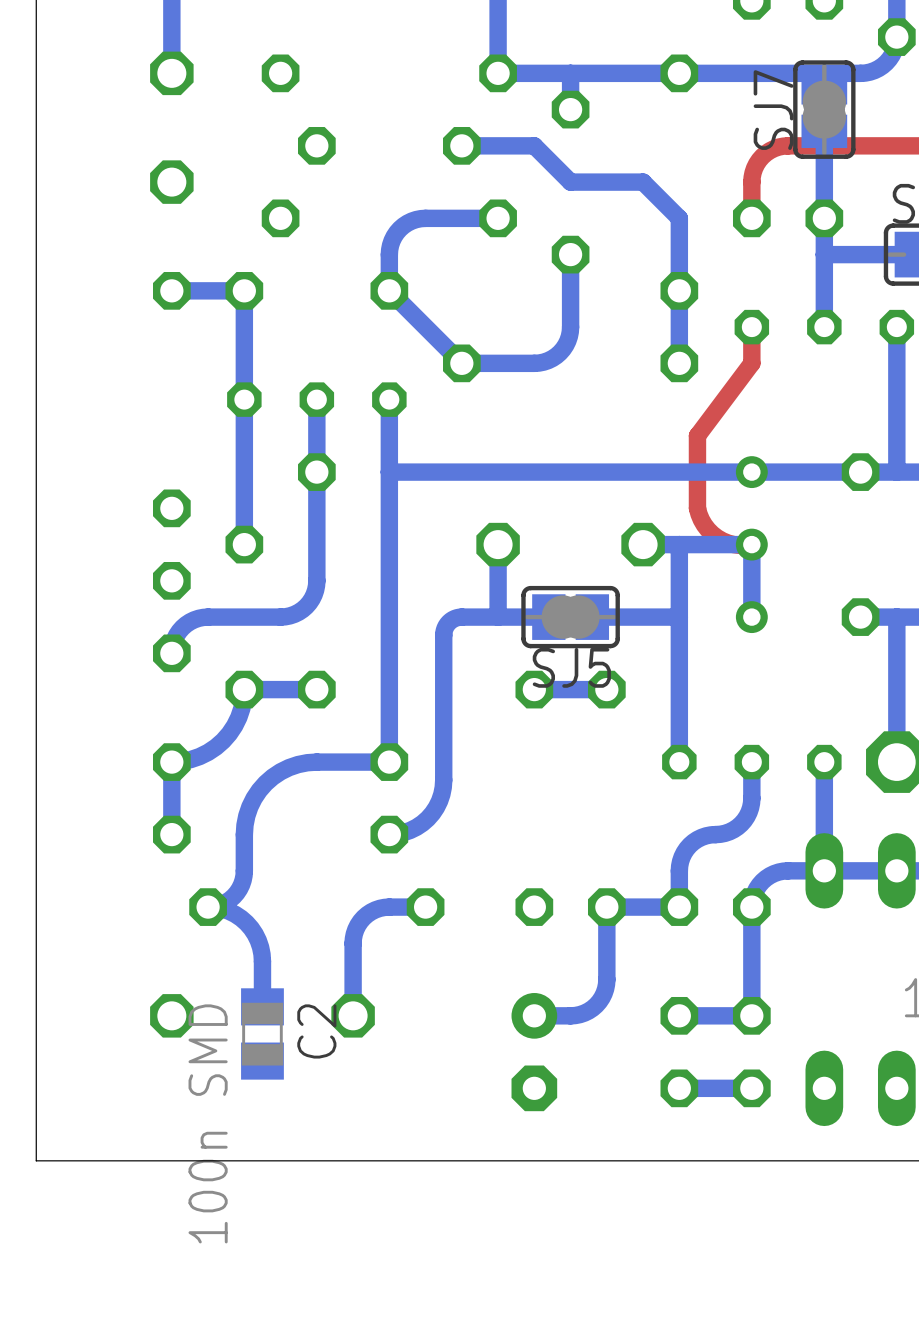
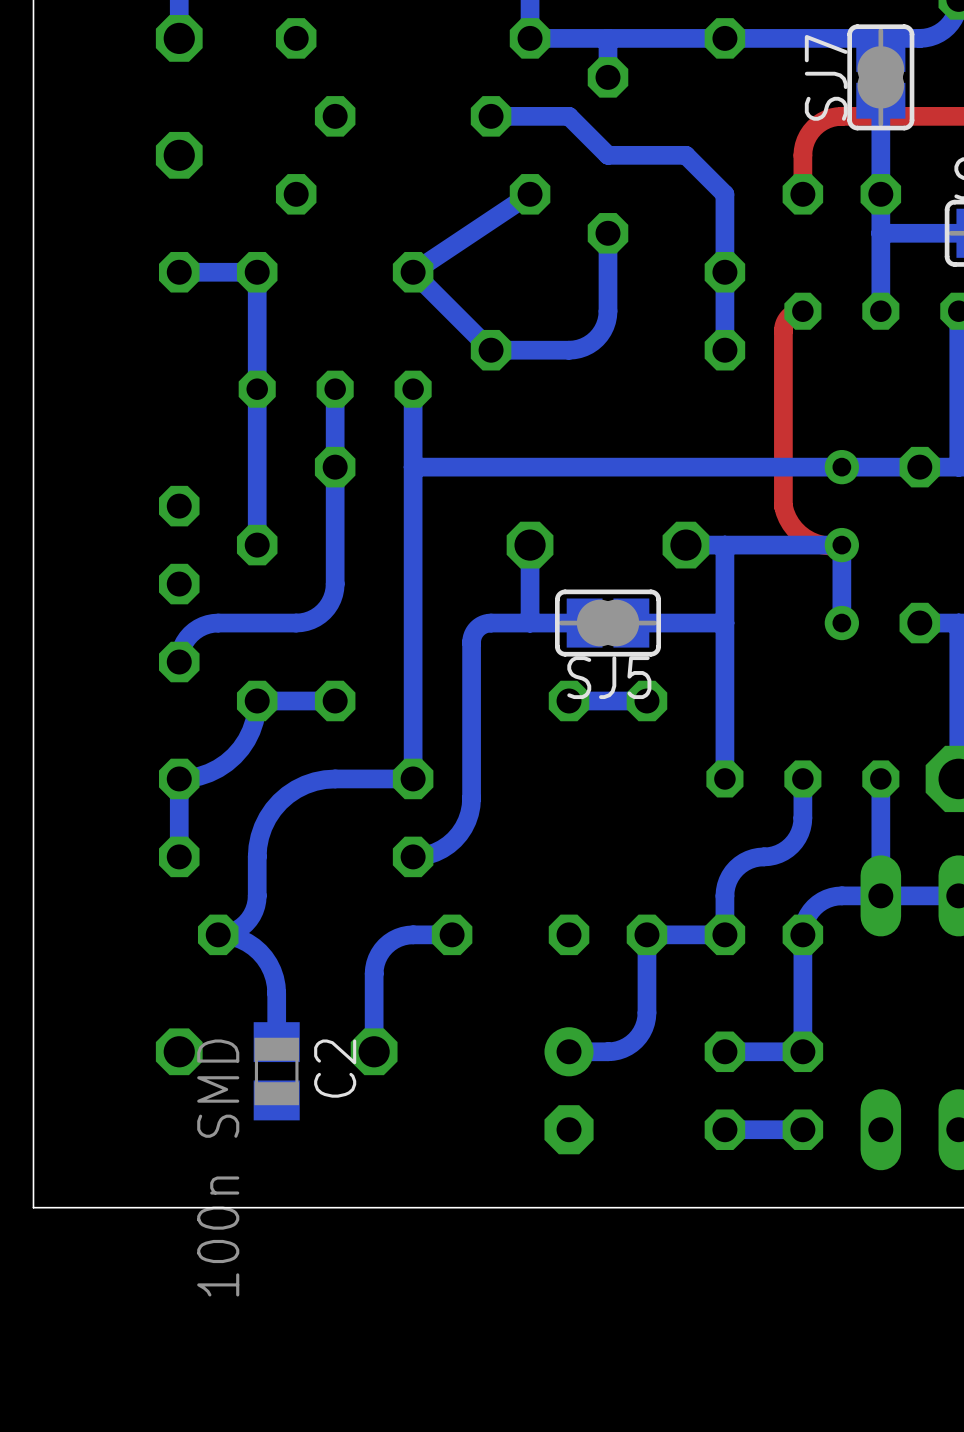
bottom track: (498, 218) (425, 218) (407, 223) (396, 232) (390, 245) (389, 290) -> (530, 194) (413, 272)
top track: (751, 327) (751, 363) (697, 435) (697, 508) (701, 519) (708, 529) (722, 540) (739, 545) (751, 544) -> (802, 311) (789, 316) (783, 328) (783, 506) (790, 524) (804, 537) (822, 545) (841, 545)
bottom track: (751, 544) (751, 617) -> (802, 545) (841, 545) (841, 623)
part position: (751, 544) -> (841, 545)

